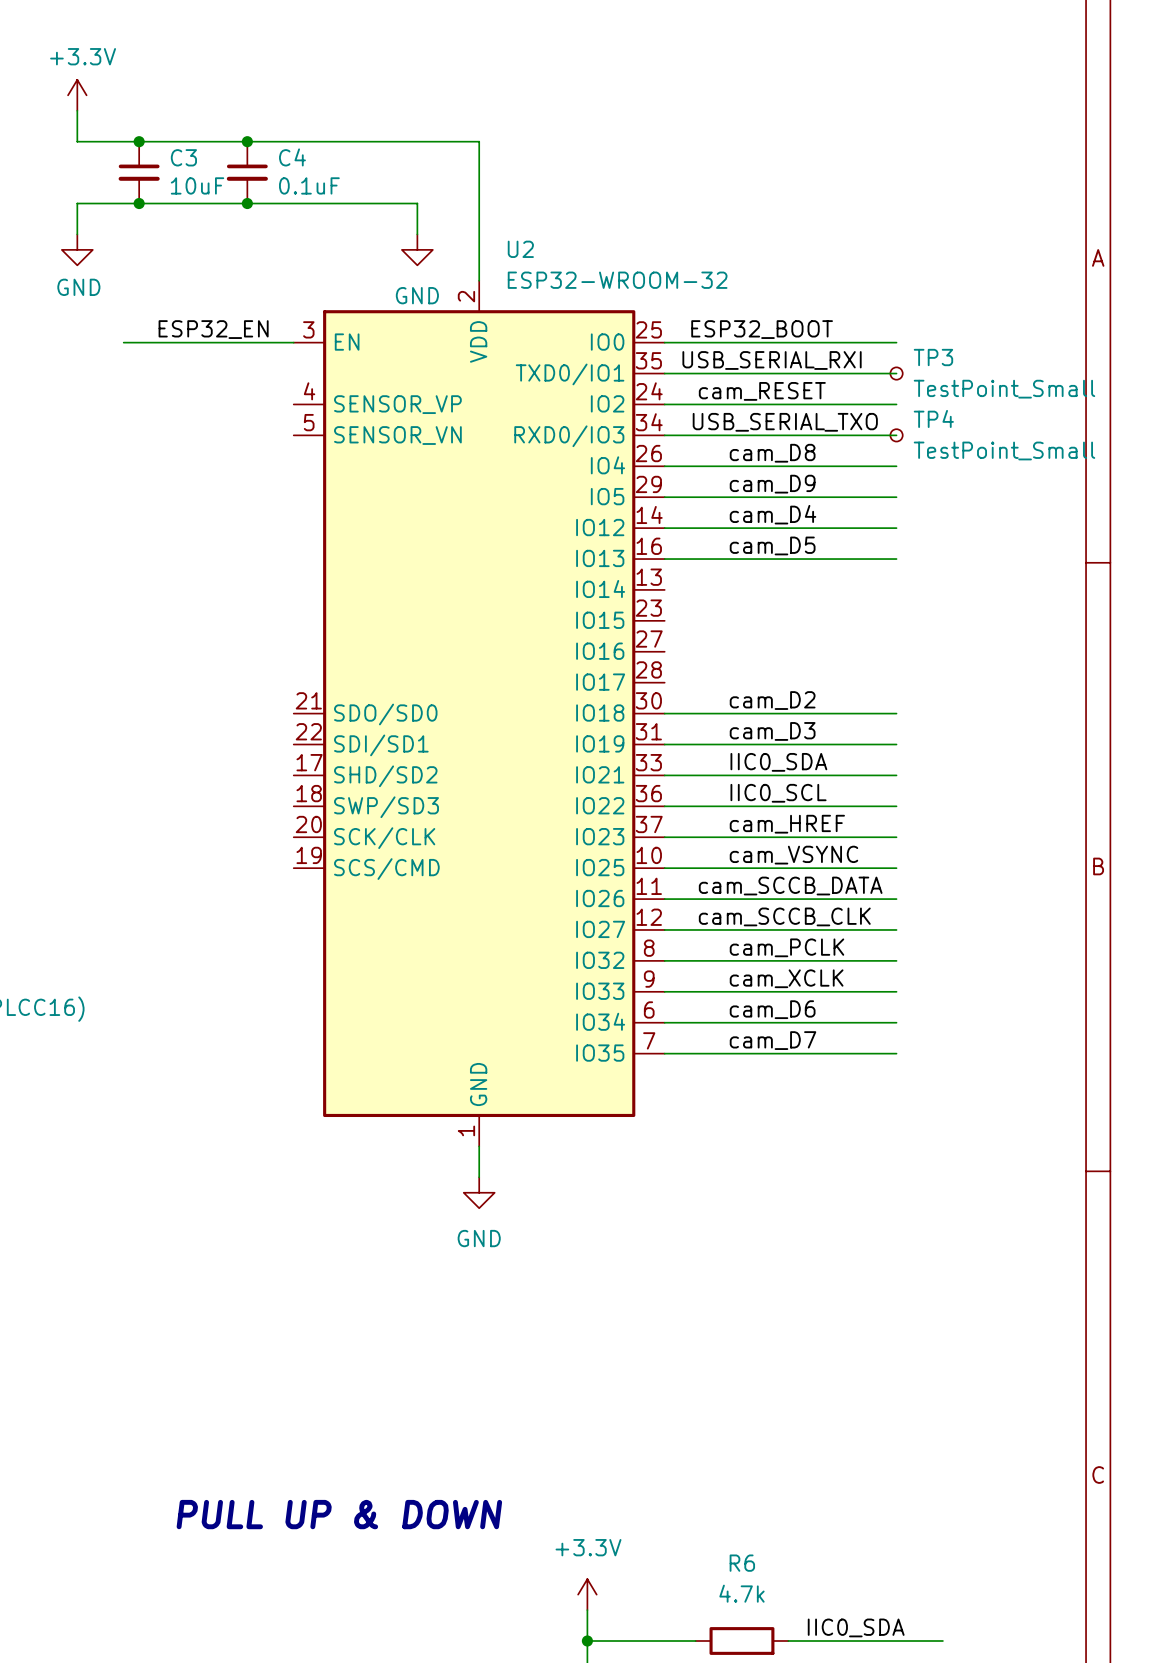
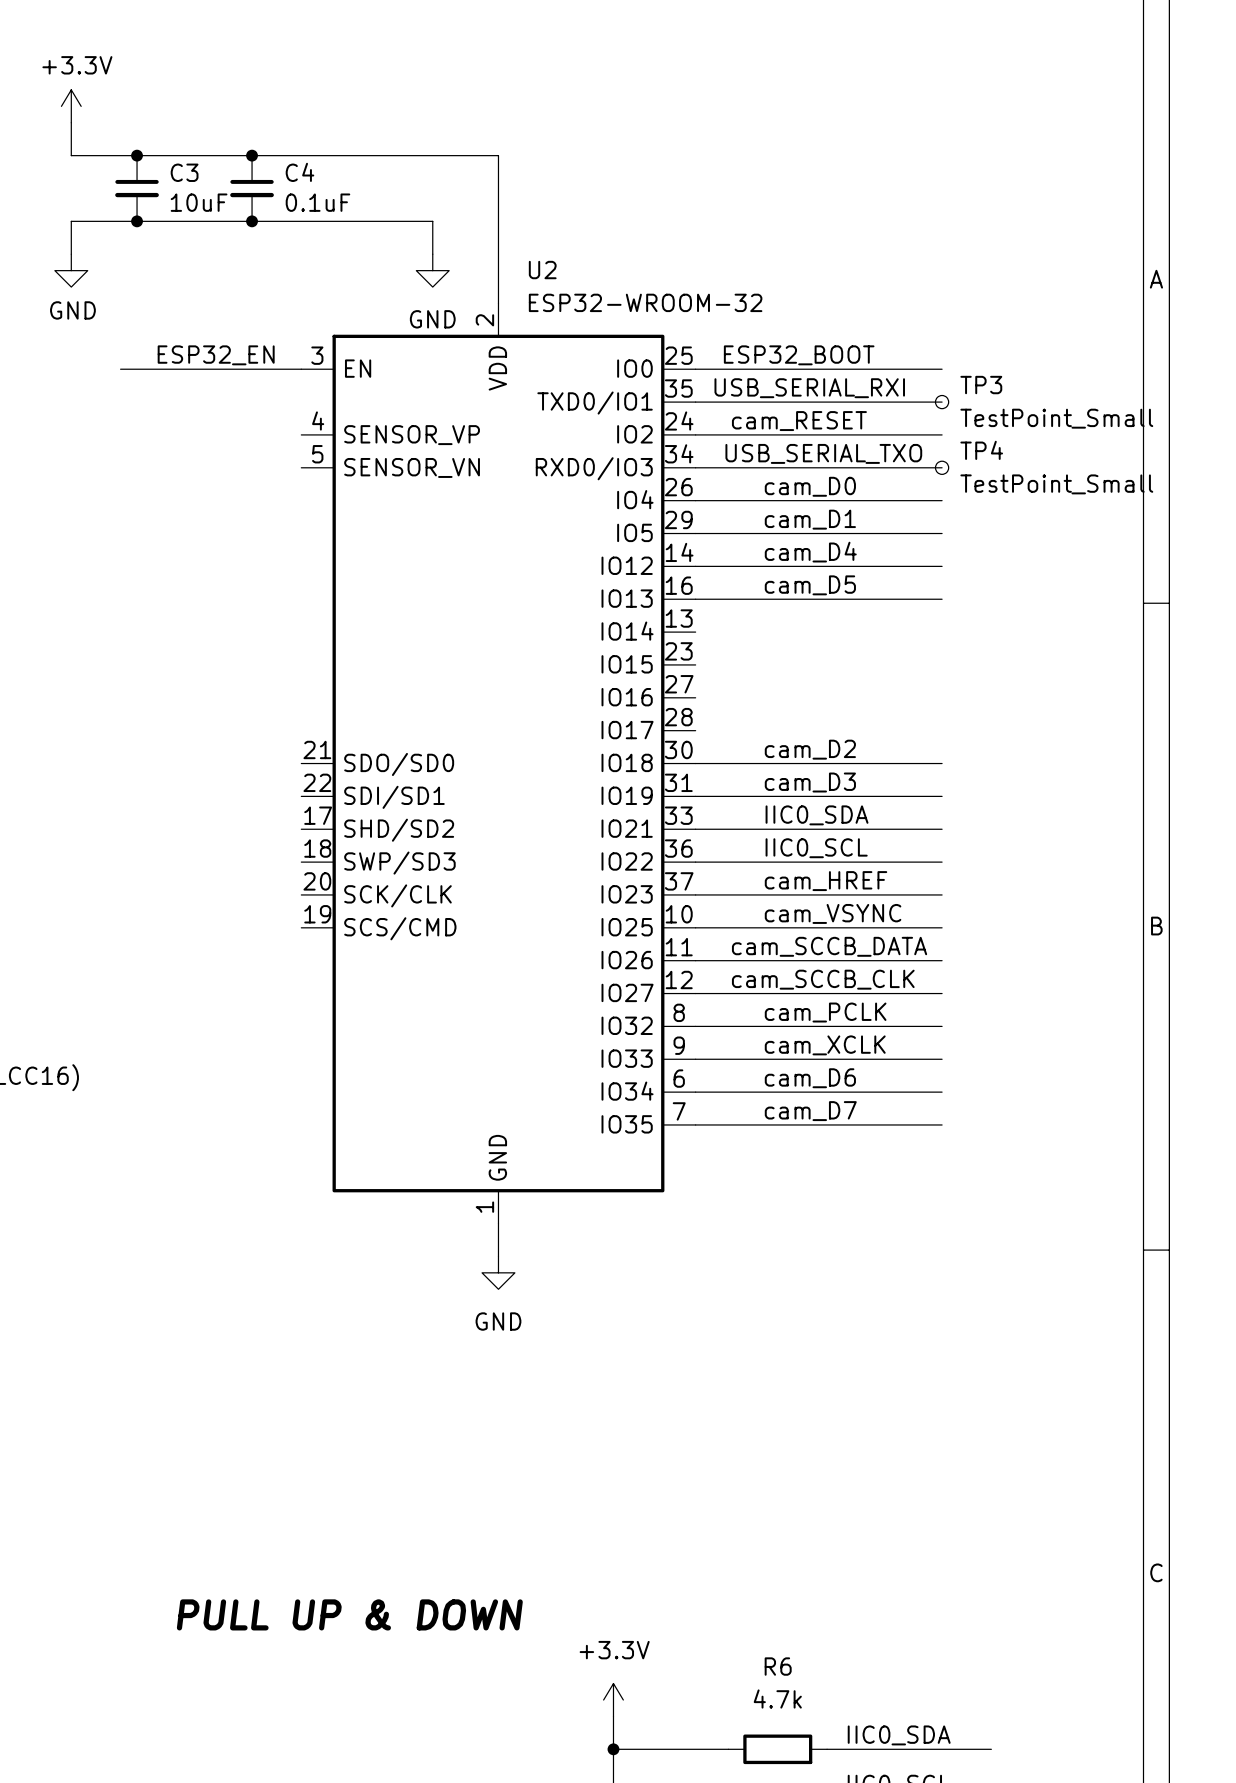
label: cam_D8 (772, 453) -> cam_D0 (810, 486)
label: cam_D9 (772, 484) -> cam_D1 (810, 519)

